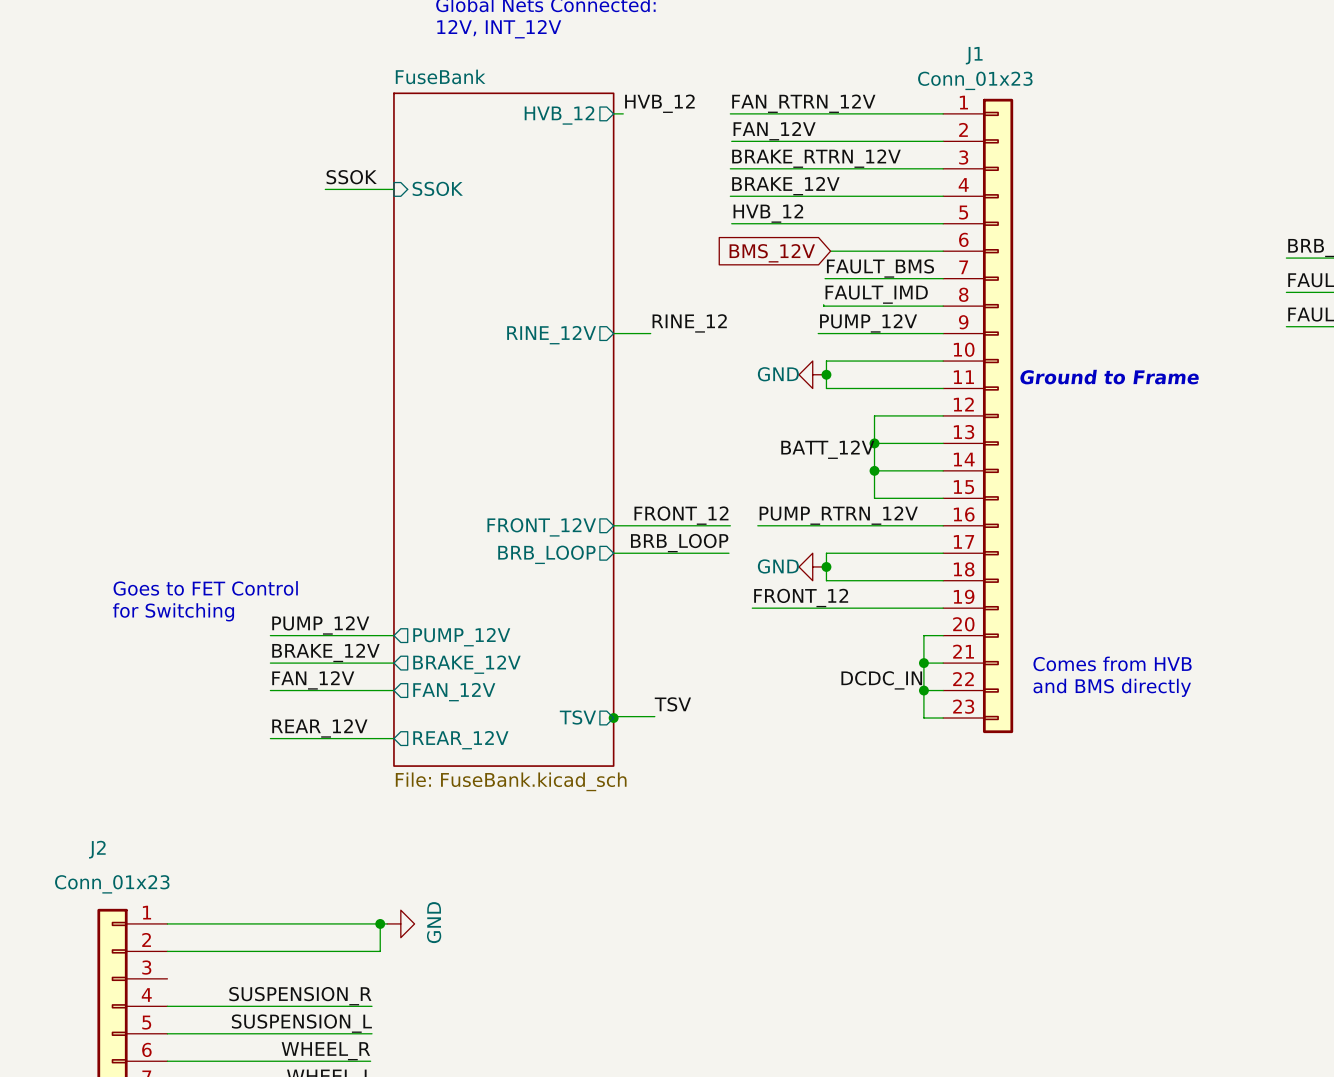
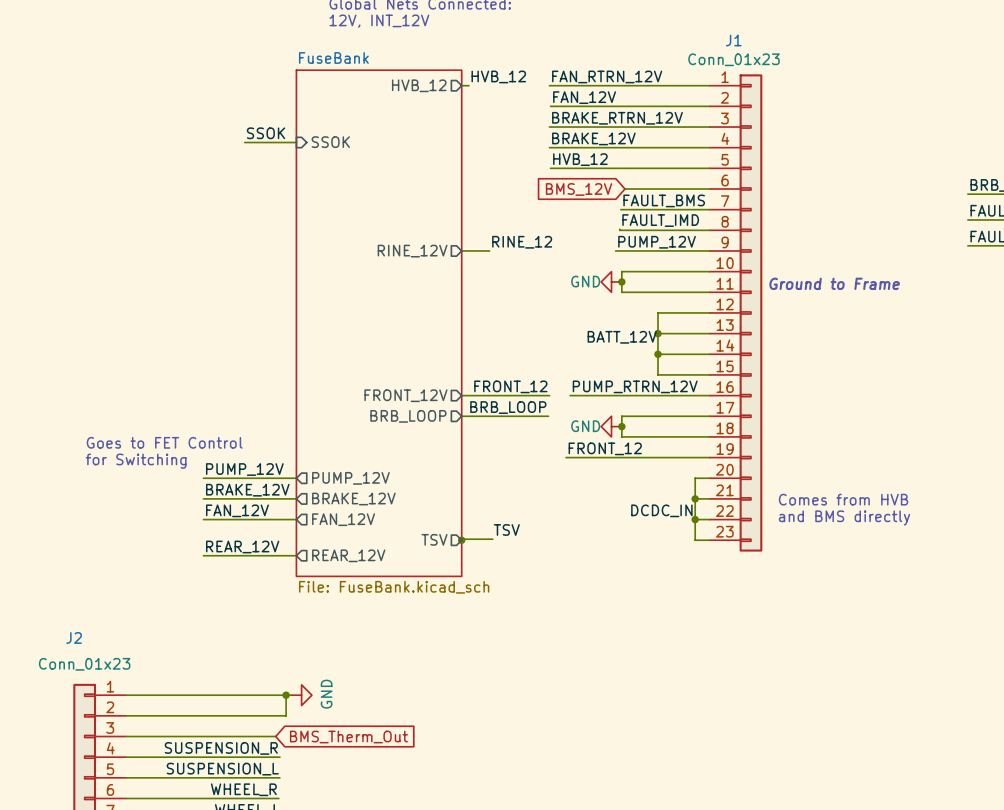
wire: none -> (125, 736) (275, 736)
global label: none -> BMS_Therm_Out (348, 737)

